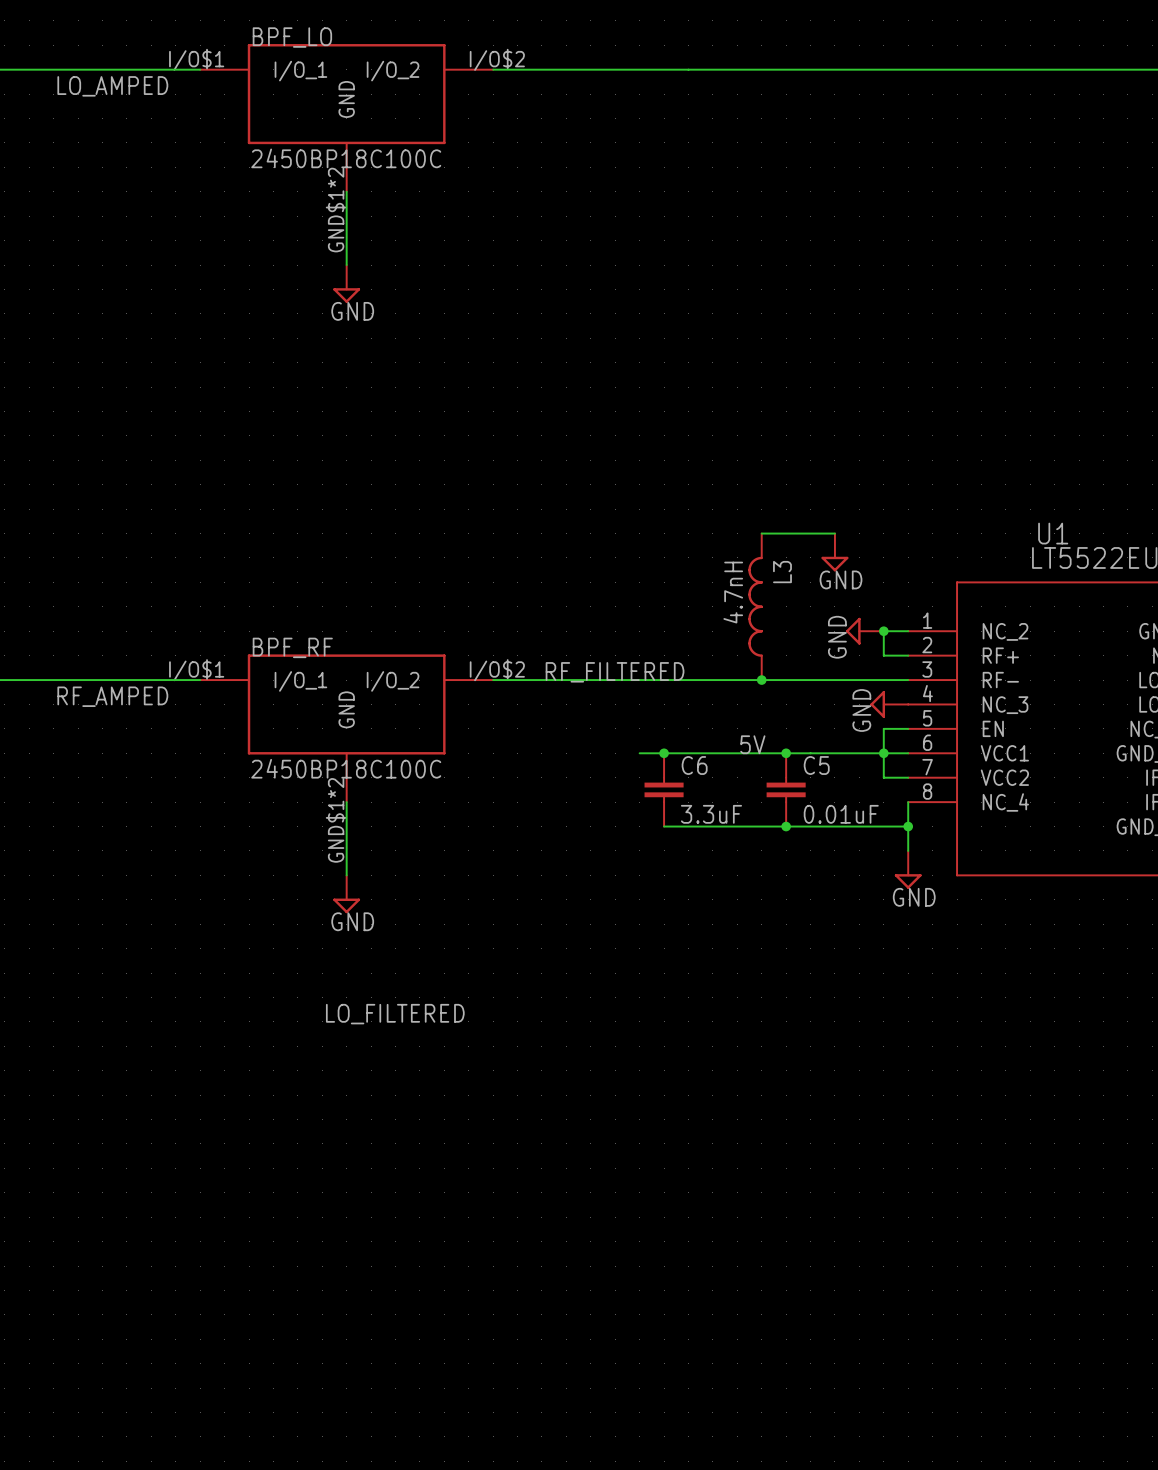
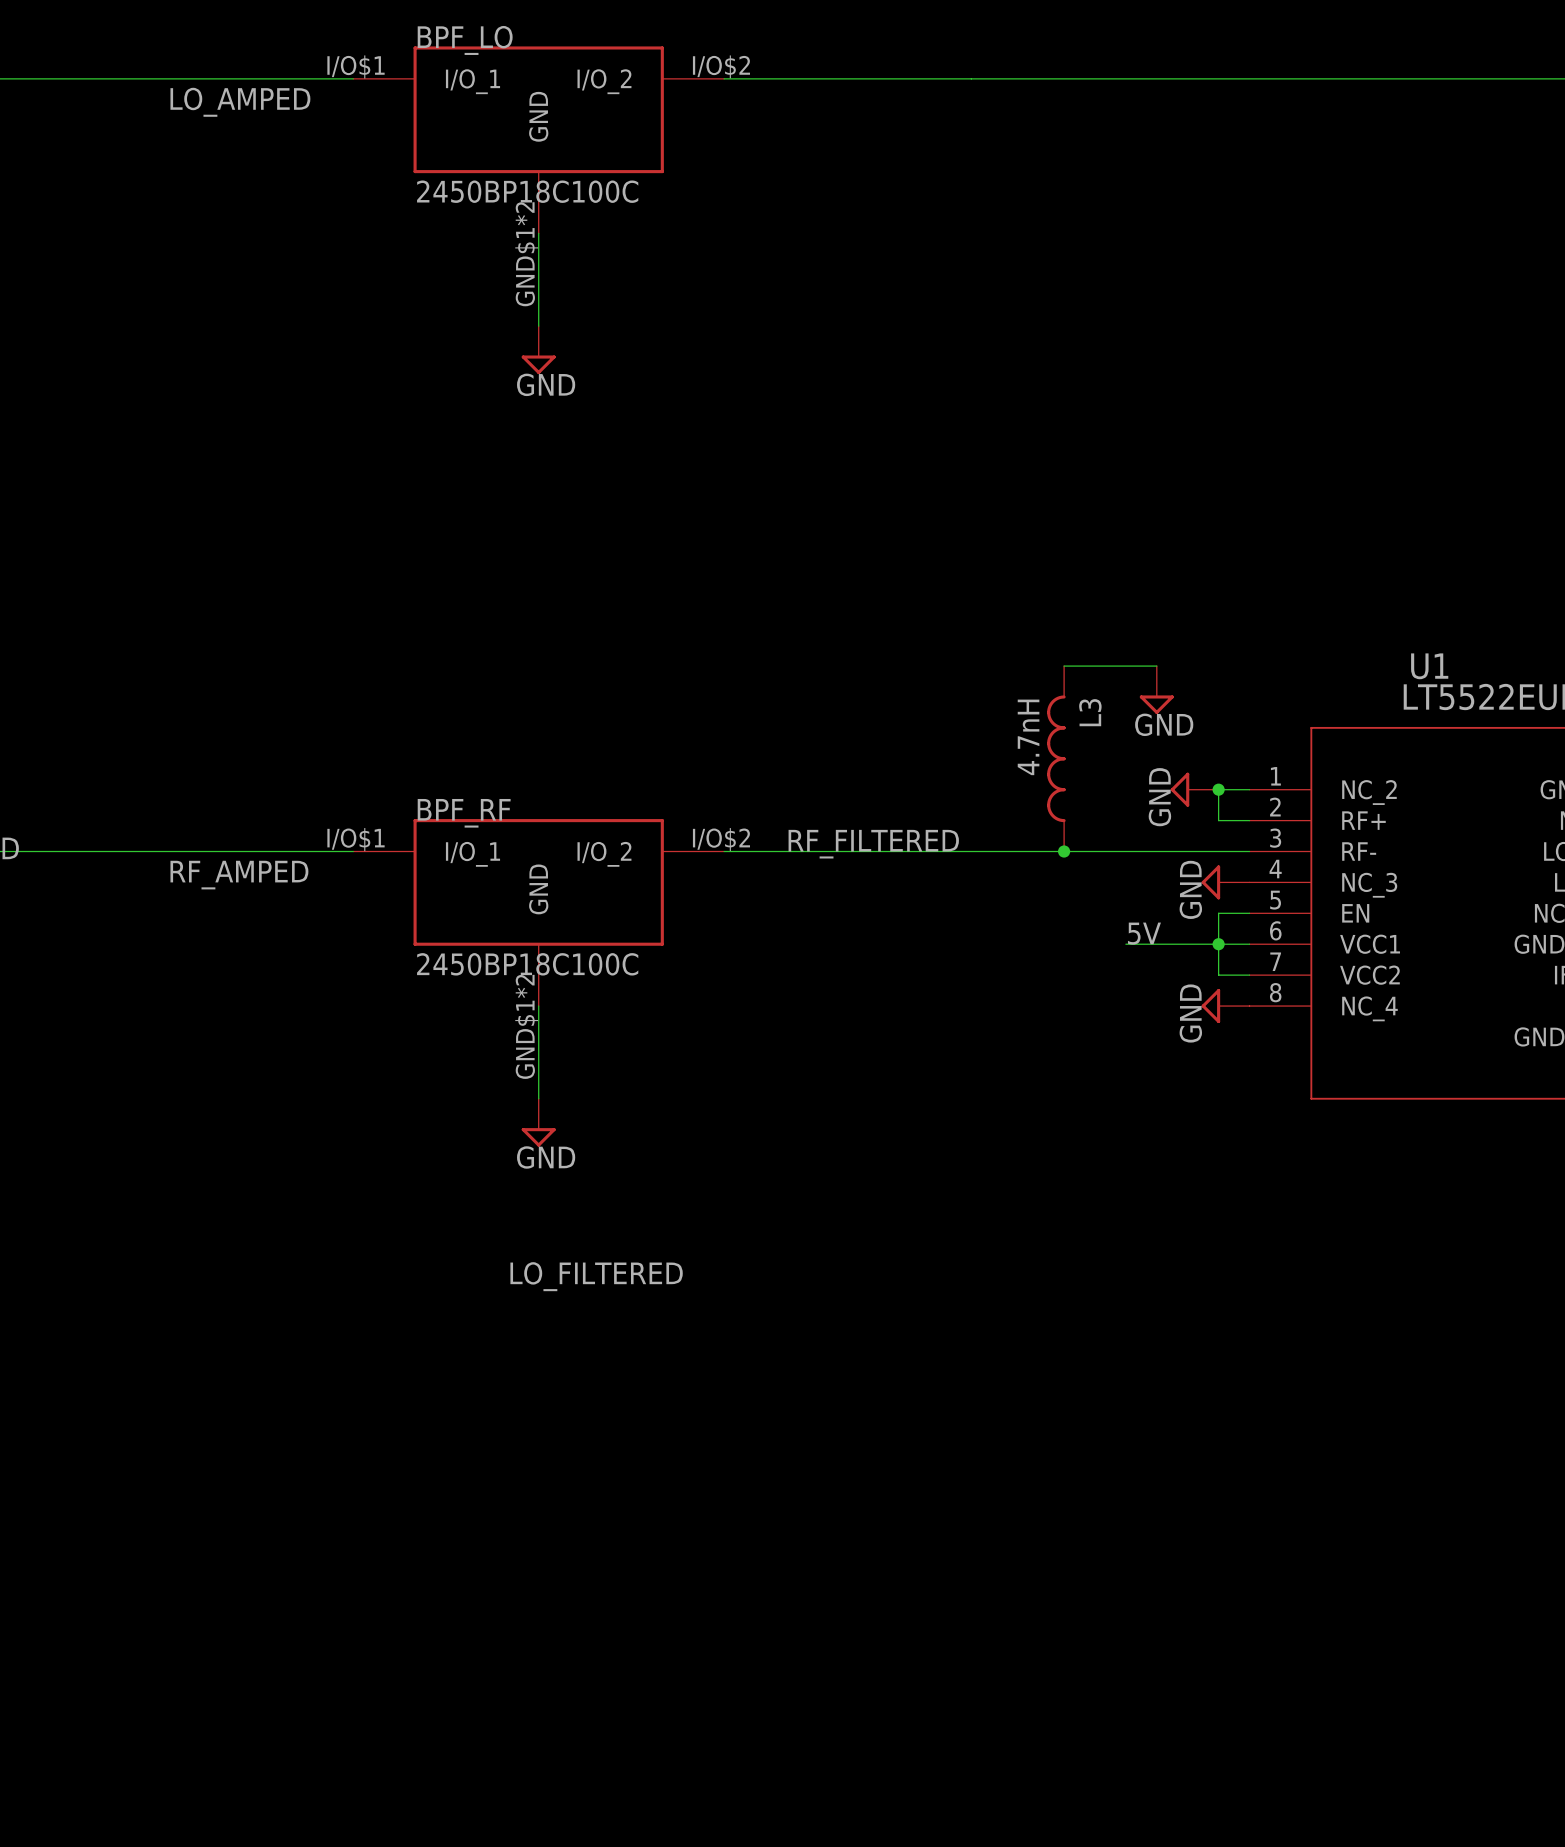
label position: 5V (752, 744) -> 5V (1144, 933)
wire: (639, 753) (810, 753) -> none
junction: (664, 753) -> none
junction: (786, 753) -> none
C6: 3.3uF (664, 789) -> none
C5: 0.01uF (786, 789) -> none
wire: (908, 802) (908, 850) -> none
wire: (664, 826) (908, 826) -> none
junction: (786, 826) -> none
junction: (908, 826) -> none
power symbol position: GND (908, 869) -> GND (1225, 1006)
power symbol rotation: 0° (908, 881) -> 90° clockwise (1210, 1006)

